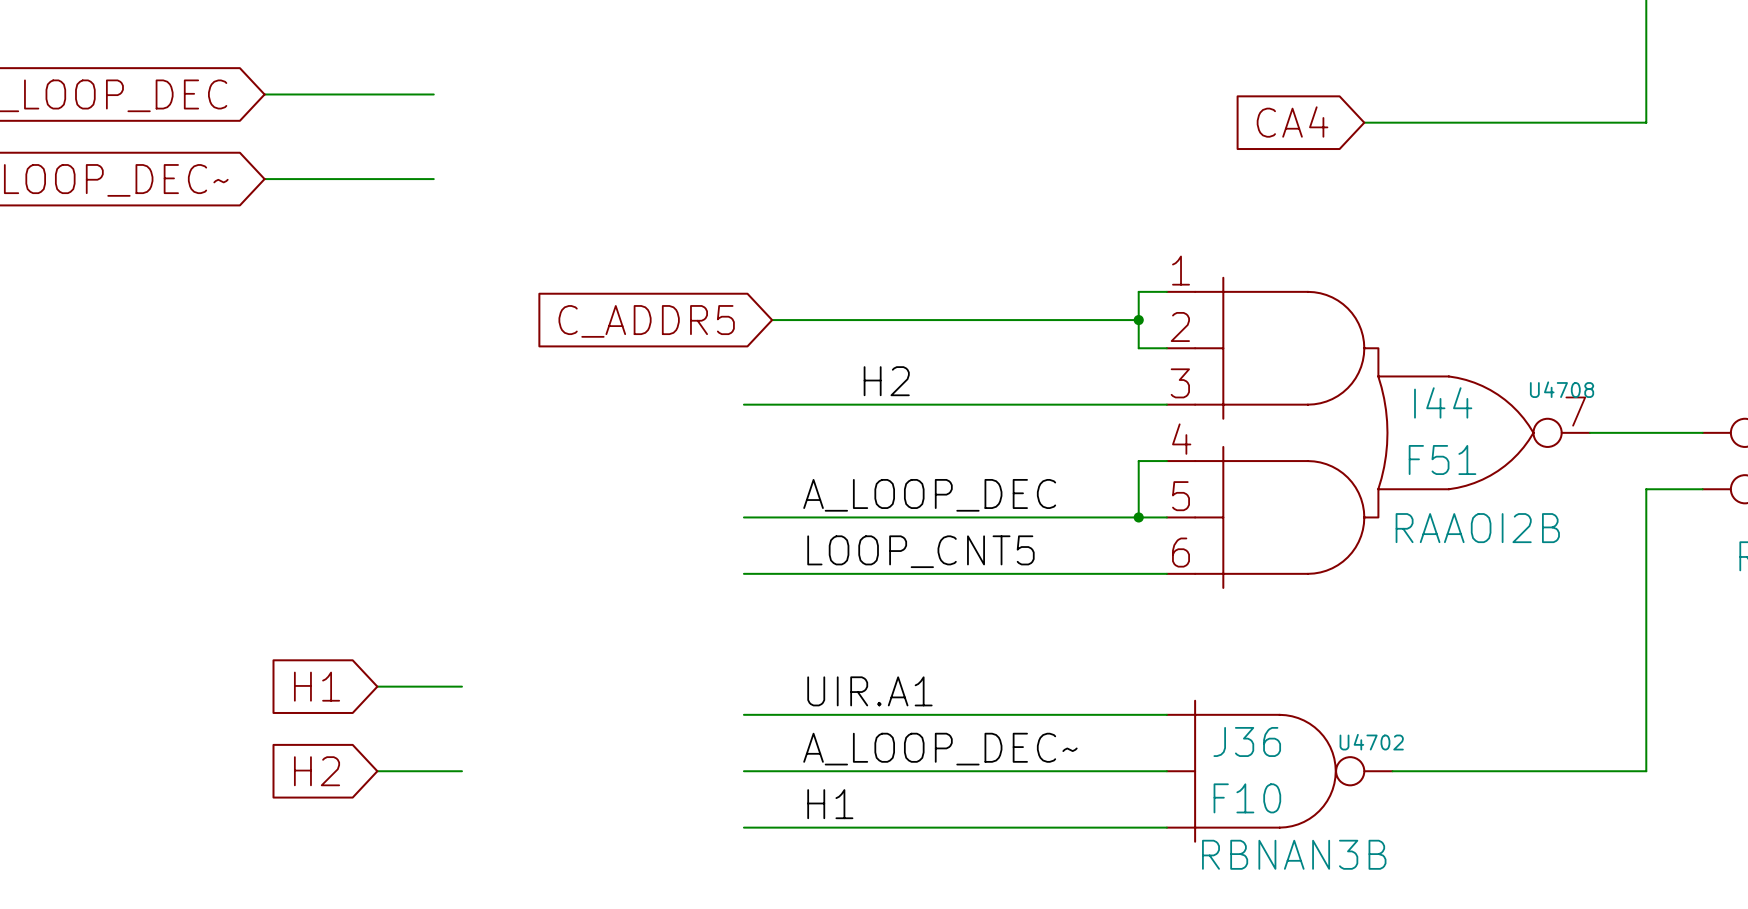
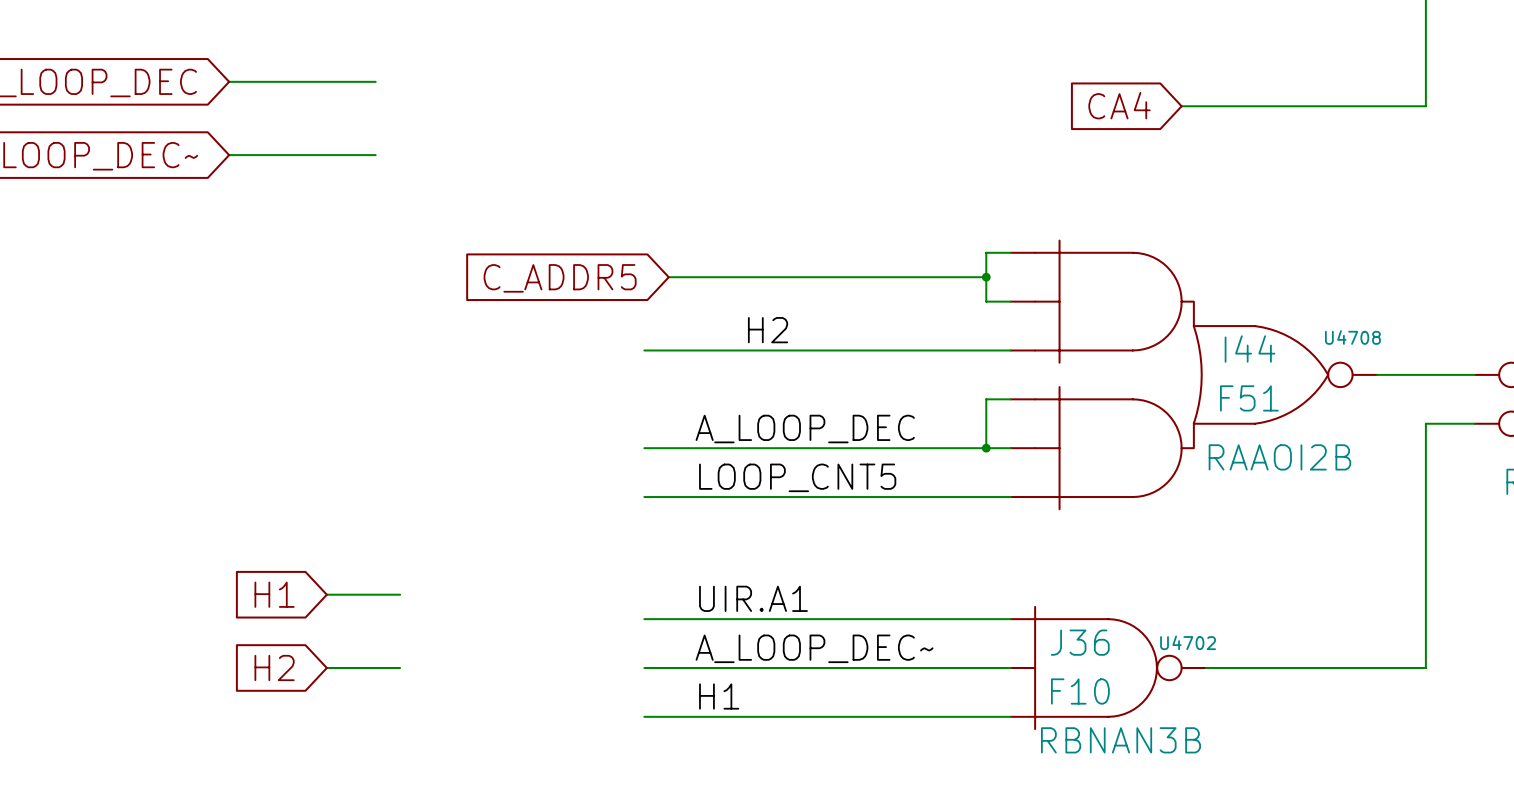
U4708 pin number: 1 (1181, 270) -> none
U4708 pin number: 2 (1180, 326) -> none
U4708 pin number: 3 (1180, 383) -> none
U4708 pin number: 7 (1575, 411) -> none
U4708 pin number: 4 (1181, 439) -> none
U4708 pin number: 5 (1181, 496) -> none
U4708 pin number: 6 (1181, 552) -> none

